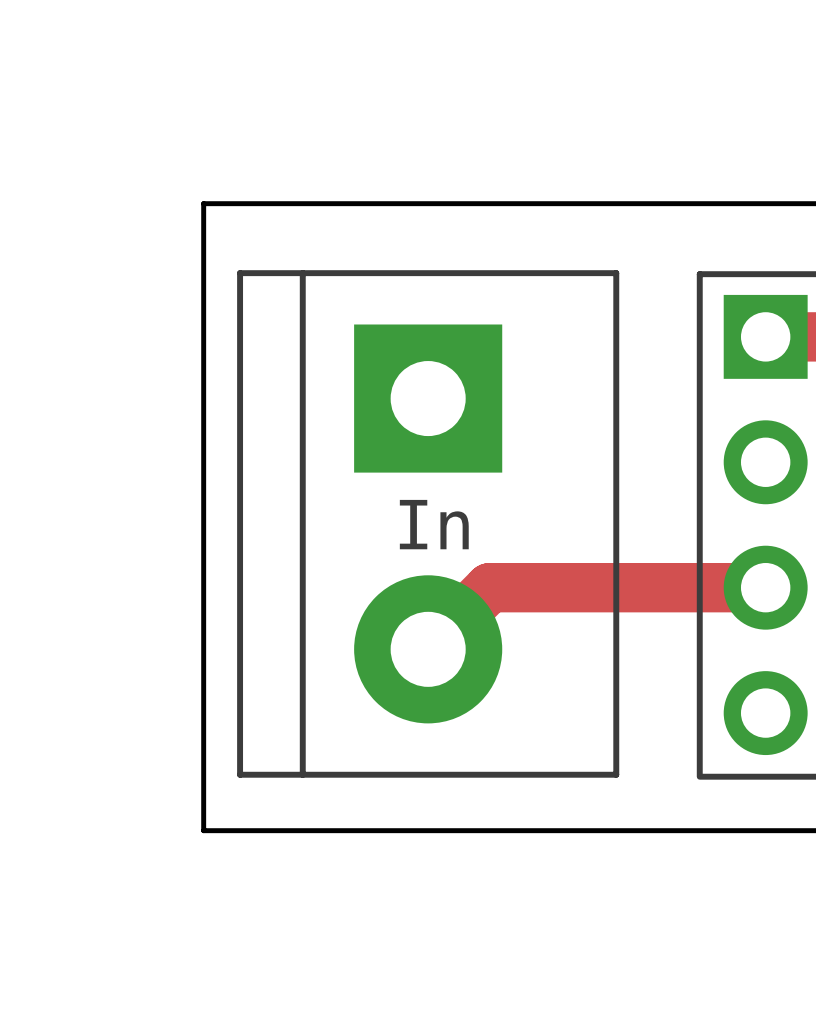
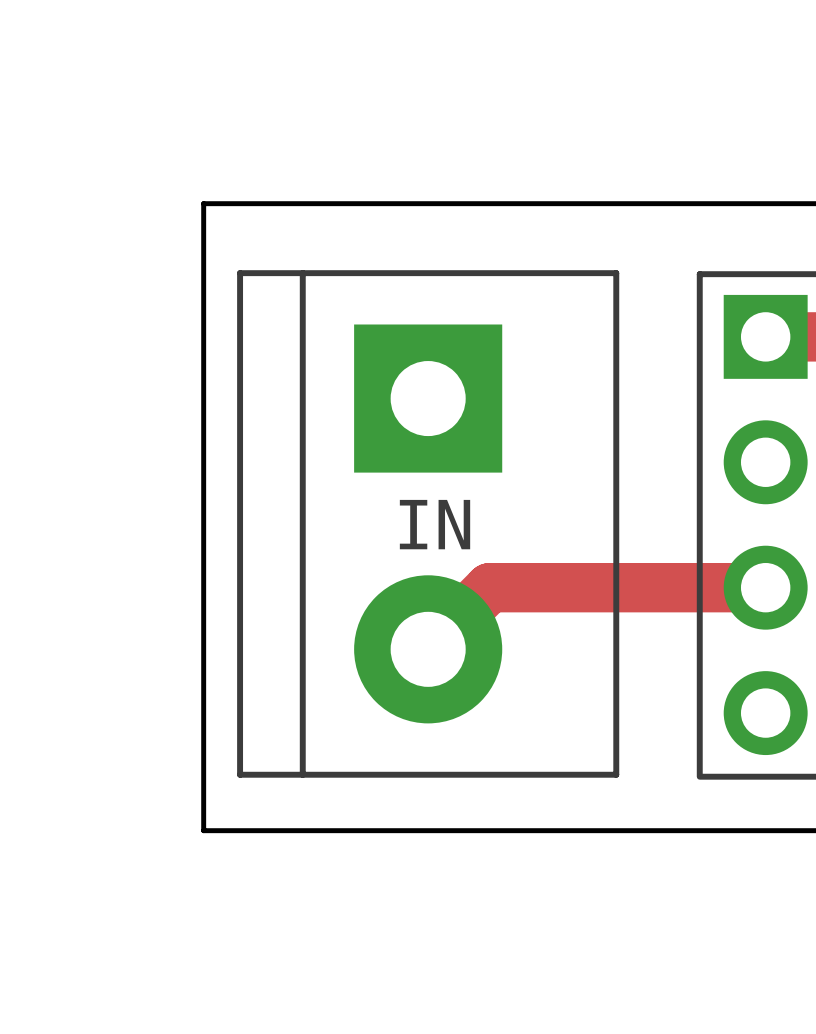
part value: In (434, 524) -> IN (435, 524)

